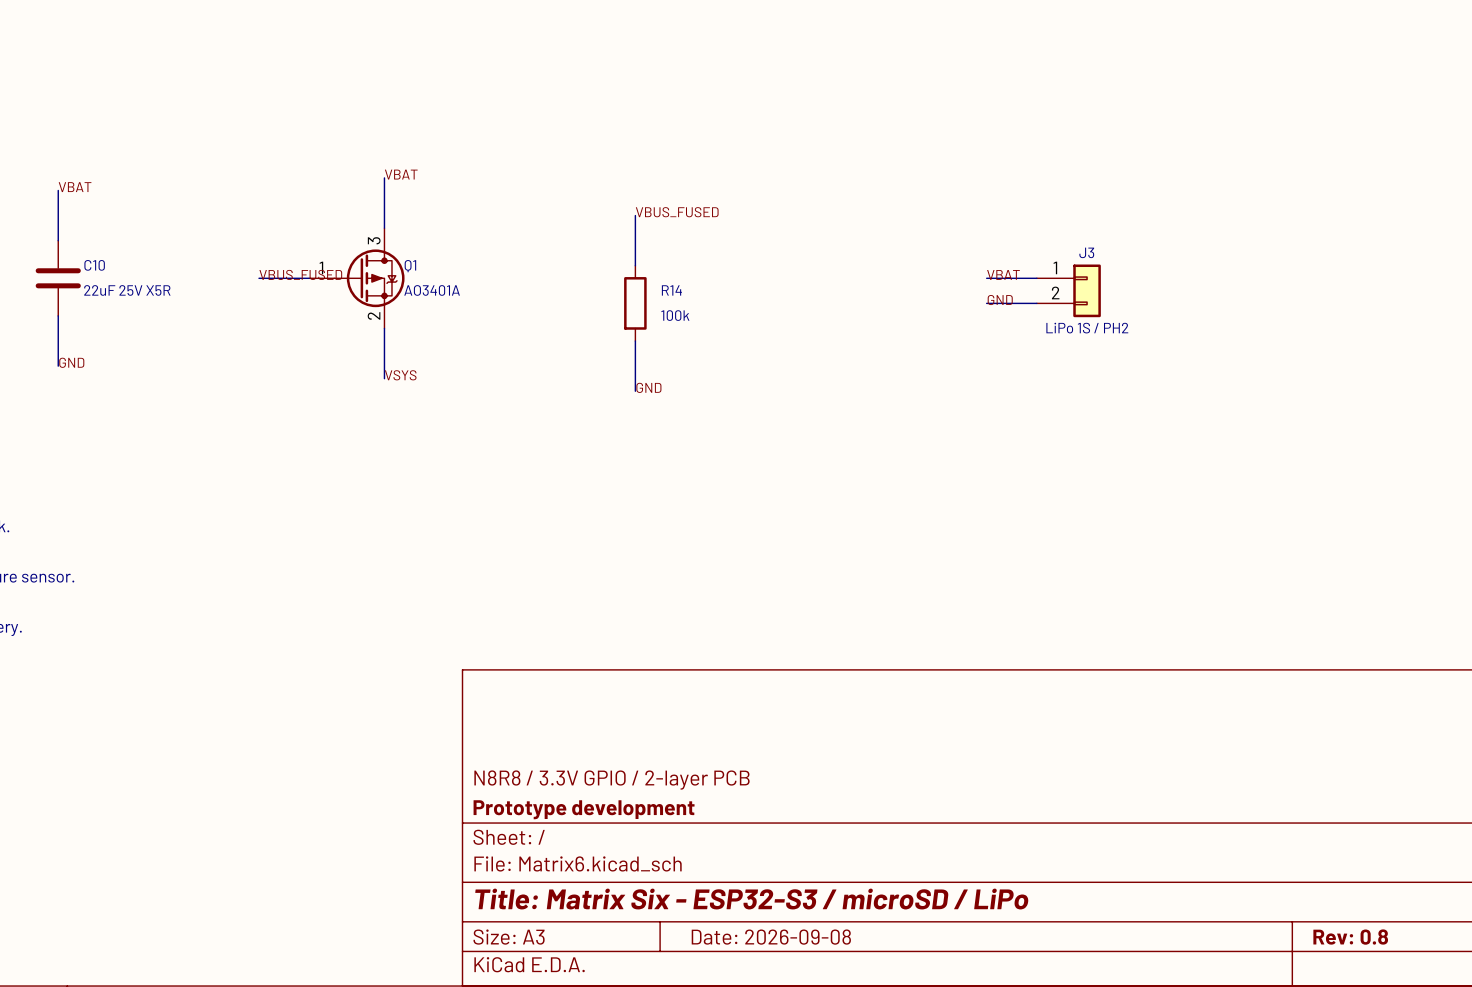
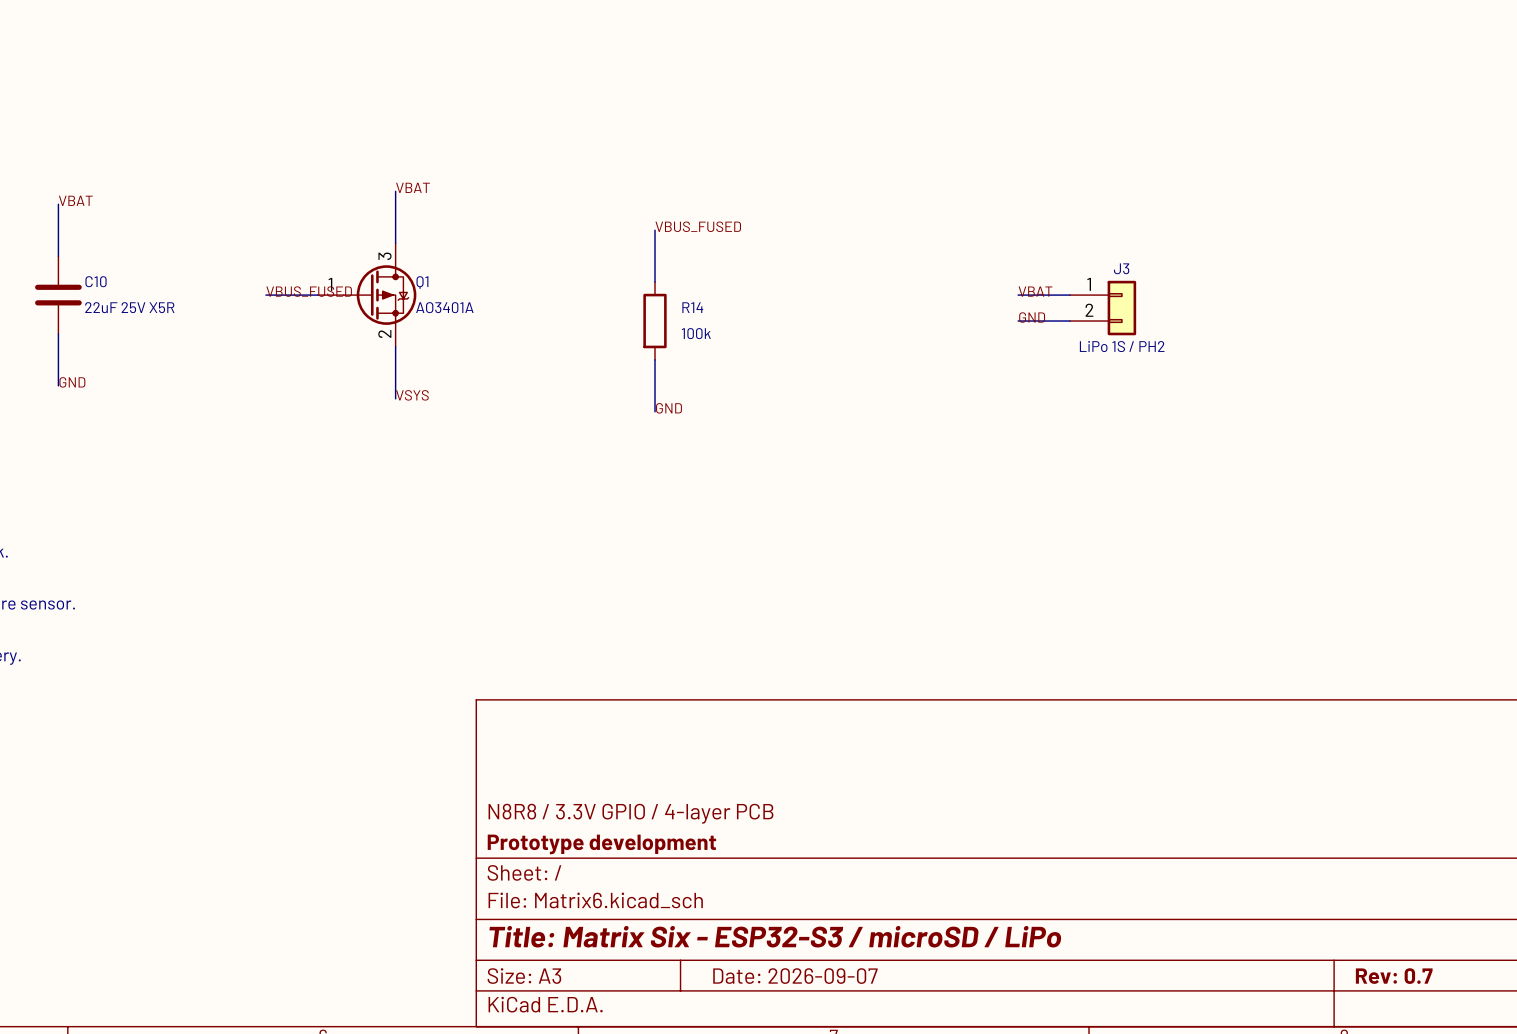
title block: N8R8 / 3.3V GPIO / 2-layer PCB (611, 780) -> N8R8 / 3.3V GPIO / 4-layer PCB (630, 813)
title block: Date: 2026-09-08 (771, 937) -> Date: 2026-09-07 (795, 976)
title block: Rev: 0.8 (1350, 937) -> Rev: 0.7 (1394, 976)

